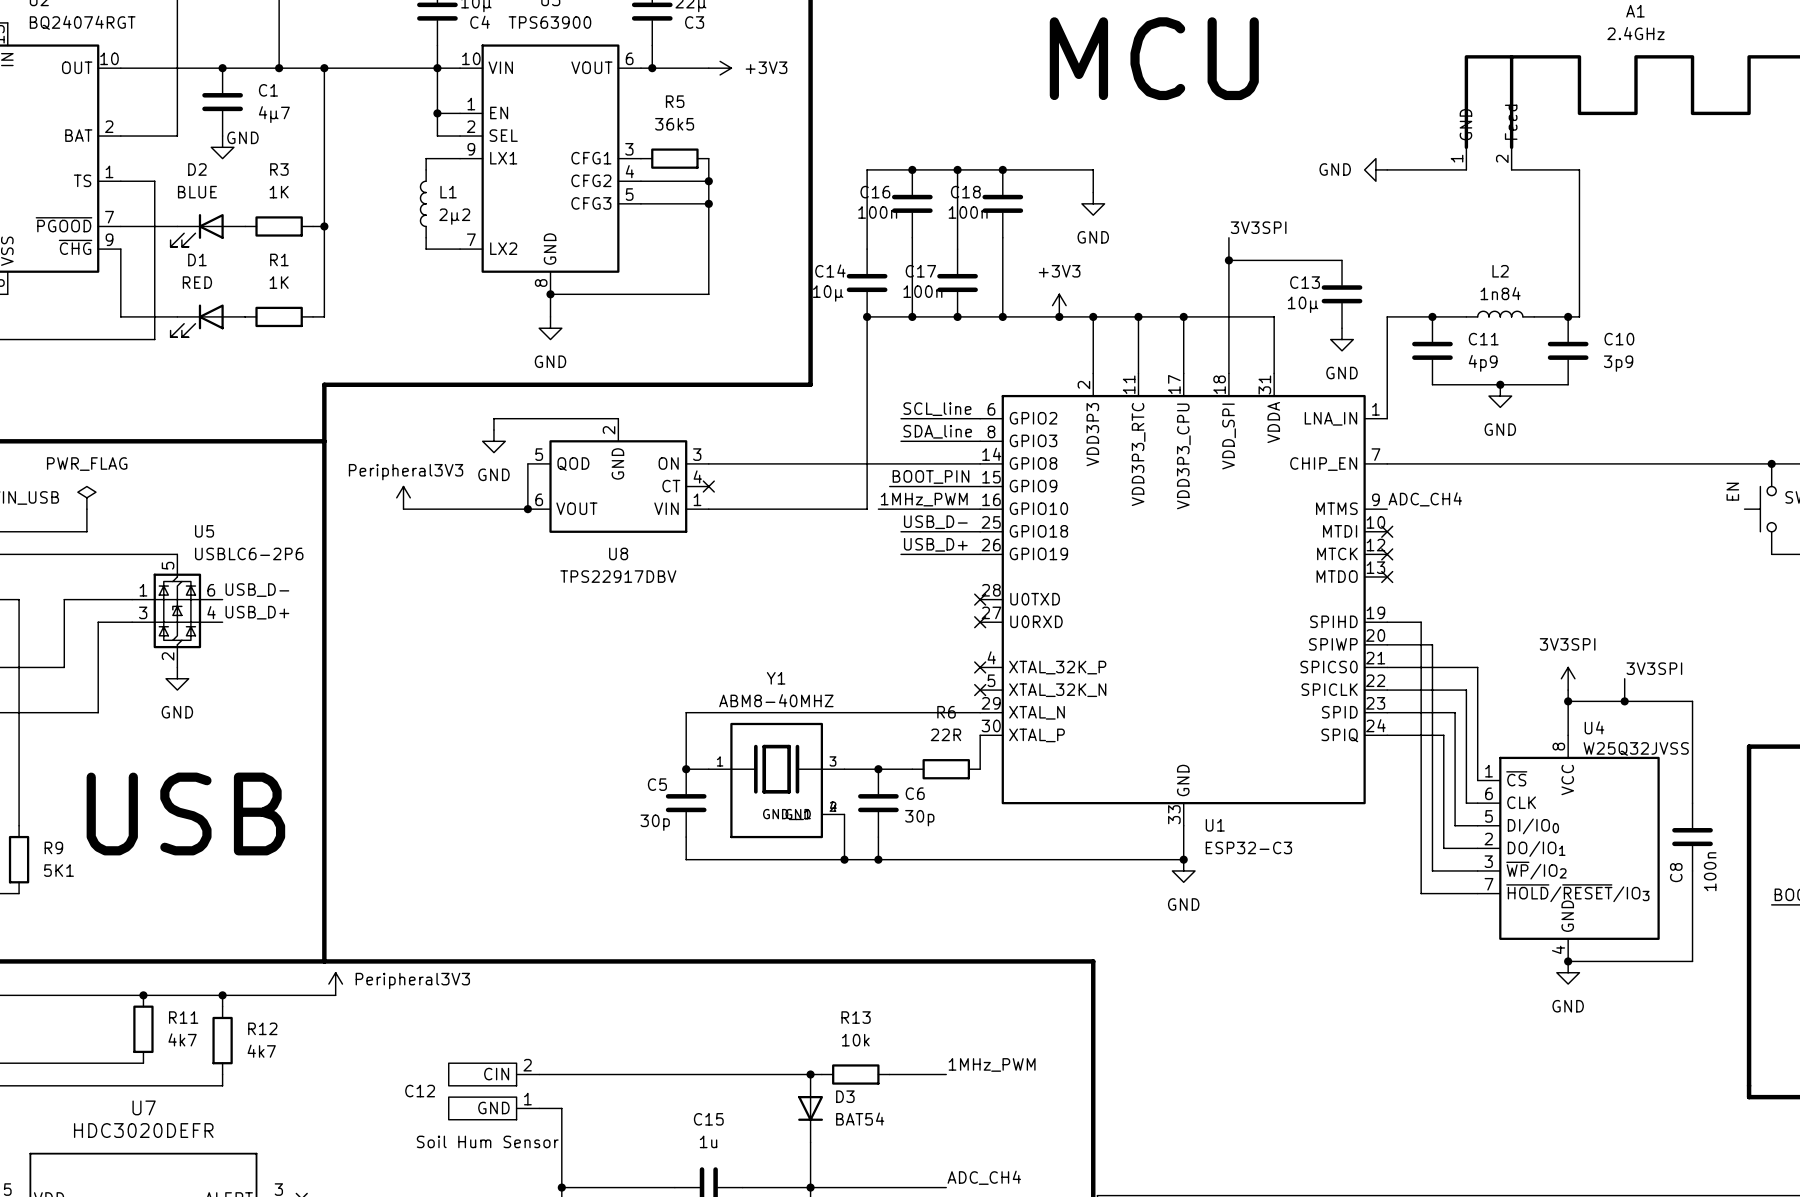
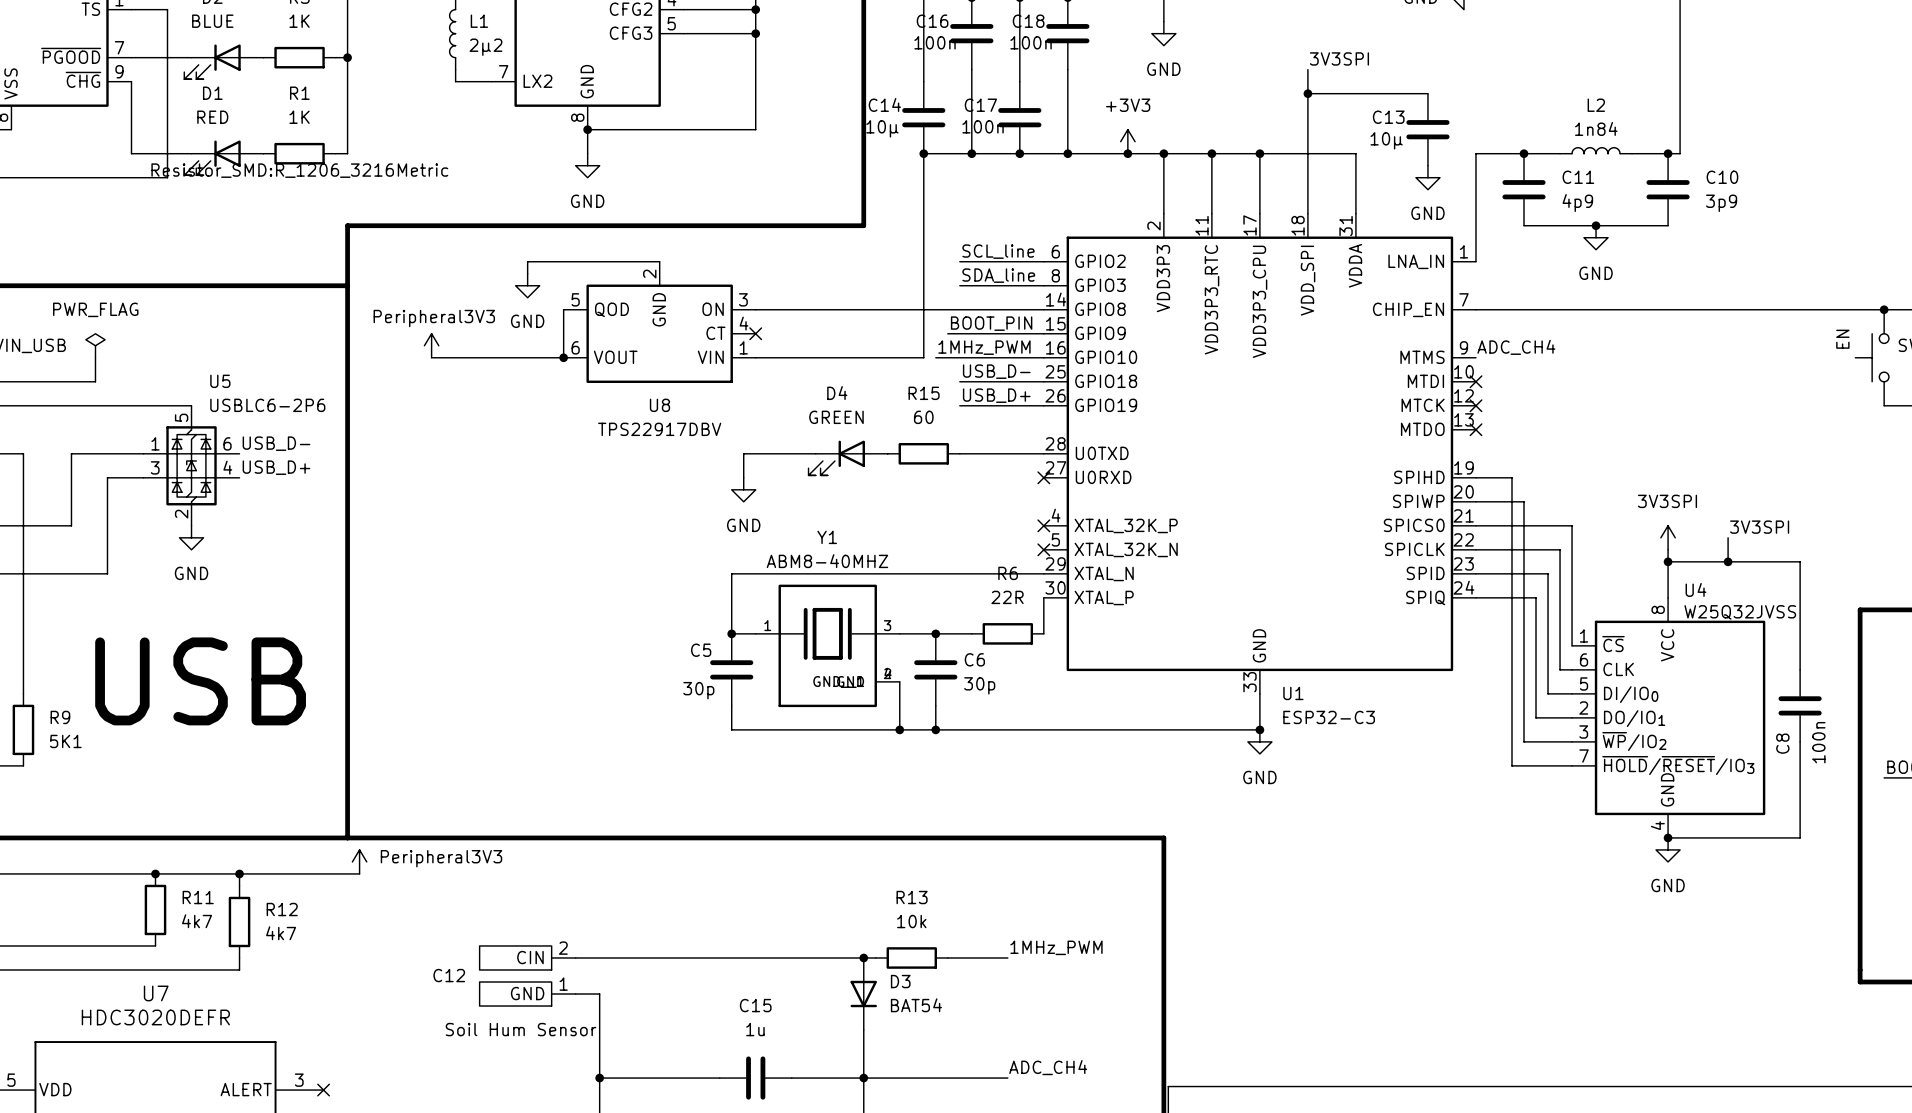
R1 text: none -> Resistor_SMD:R_1206_3216Metric (299, 170)
wire: none -> (815, 453) (743, 453) (743, 477)
R15: none -> 60 (923, 453)
wire: none -> (959, 453) (1043, 453)
no-connect mark: (980, 599) -> none
D4: none -> GREEN (848, 458)
power symbol: none -> GND (743, 489)

